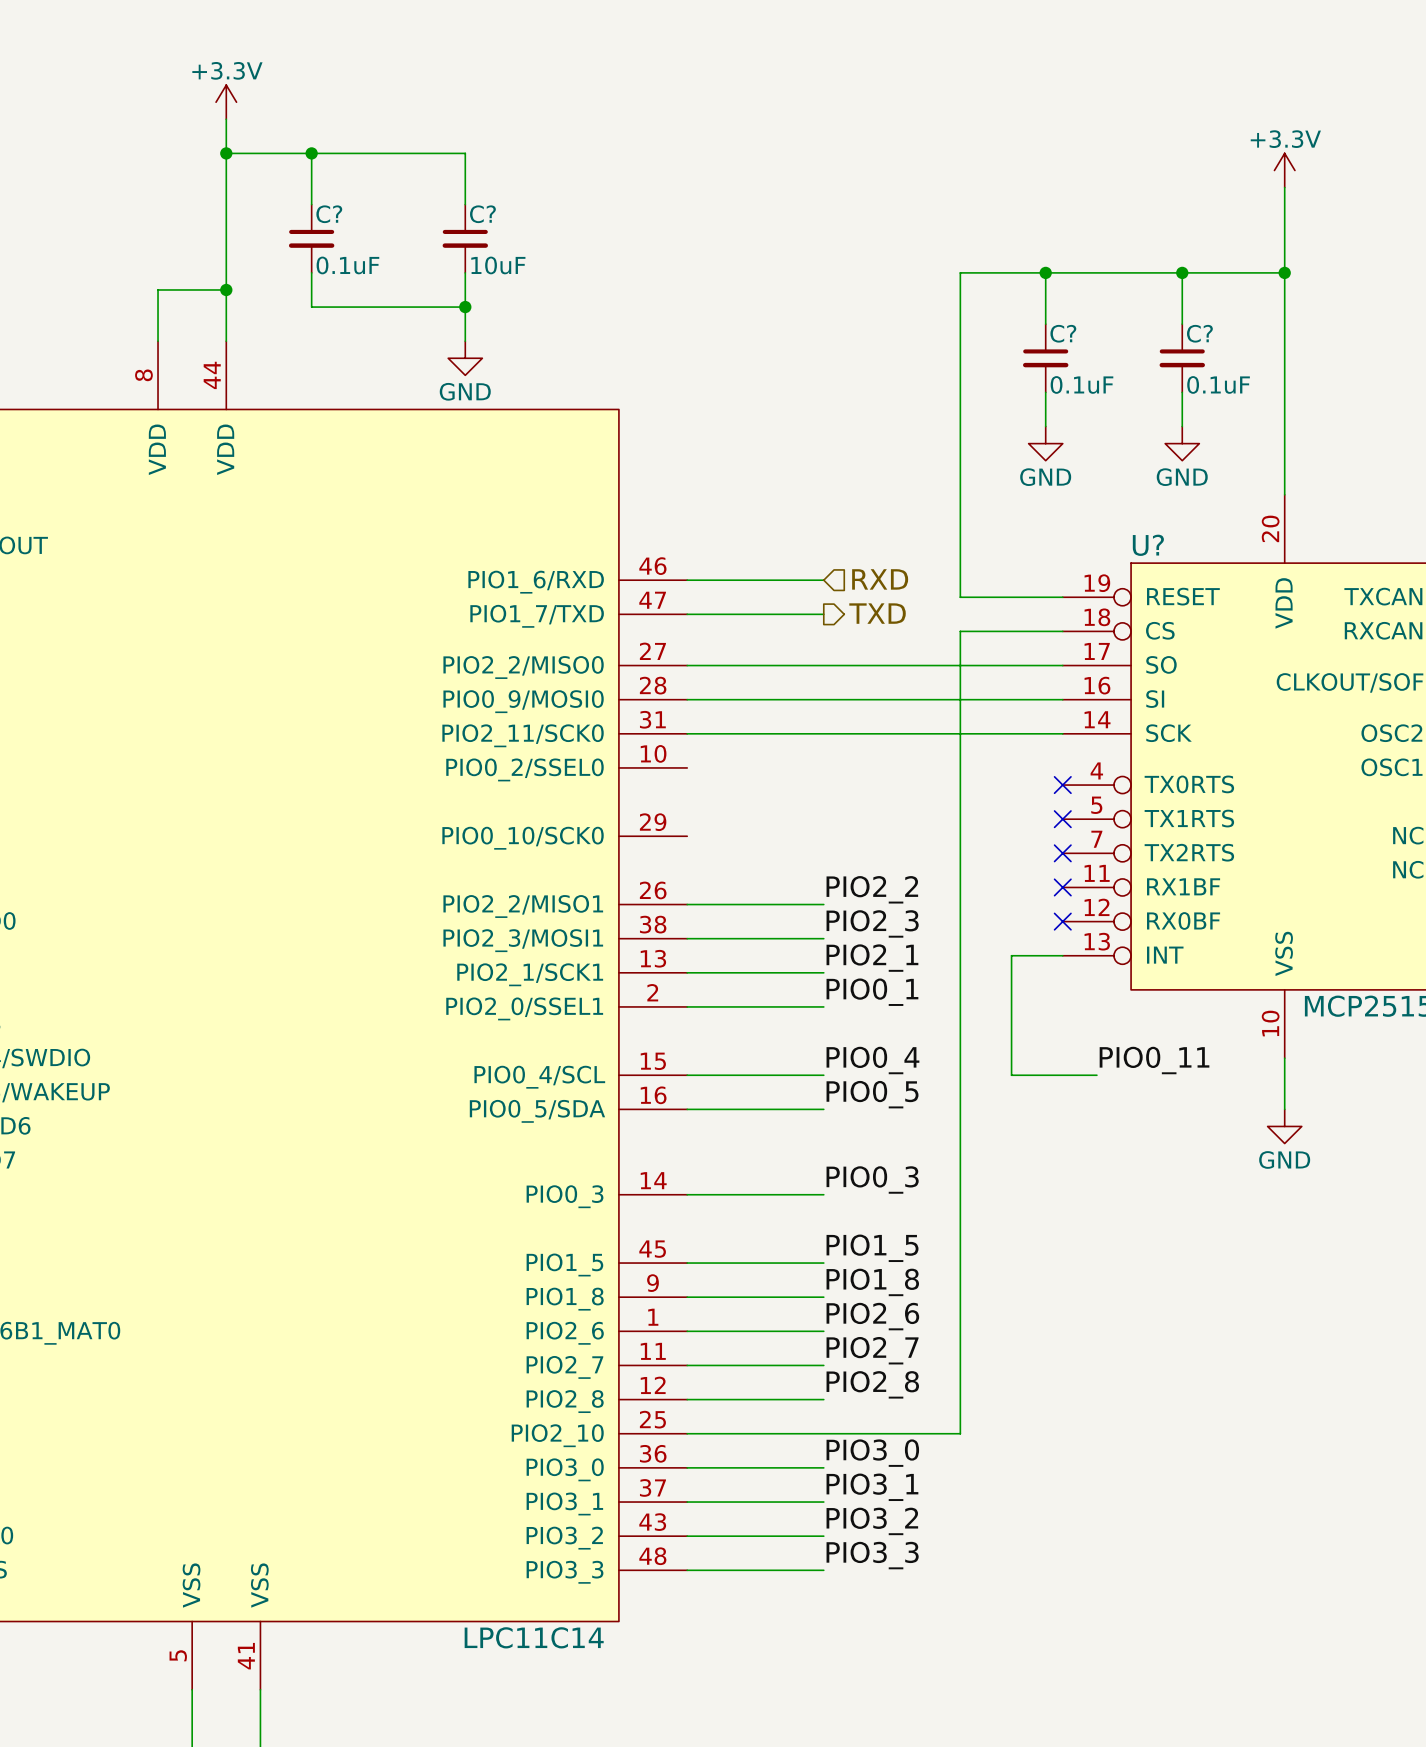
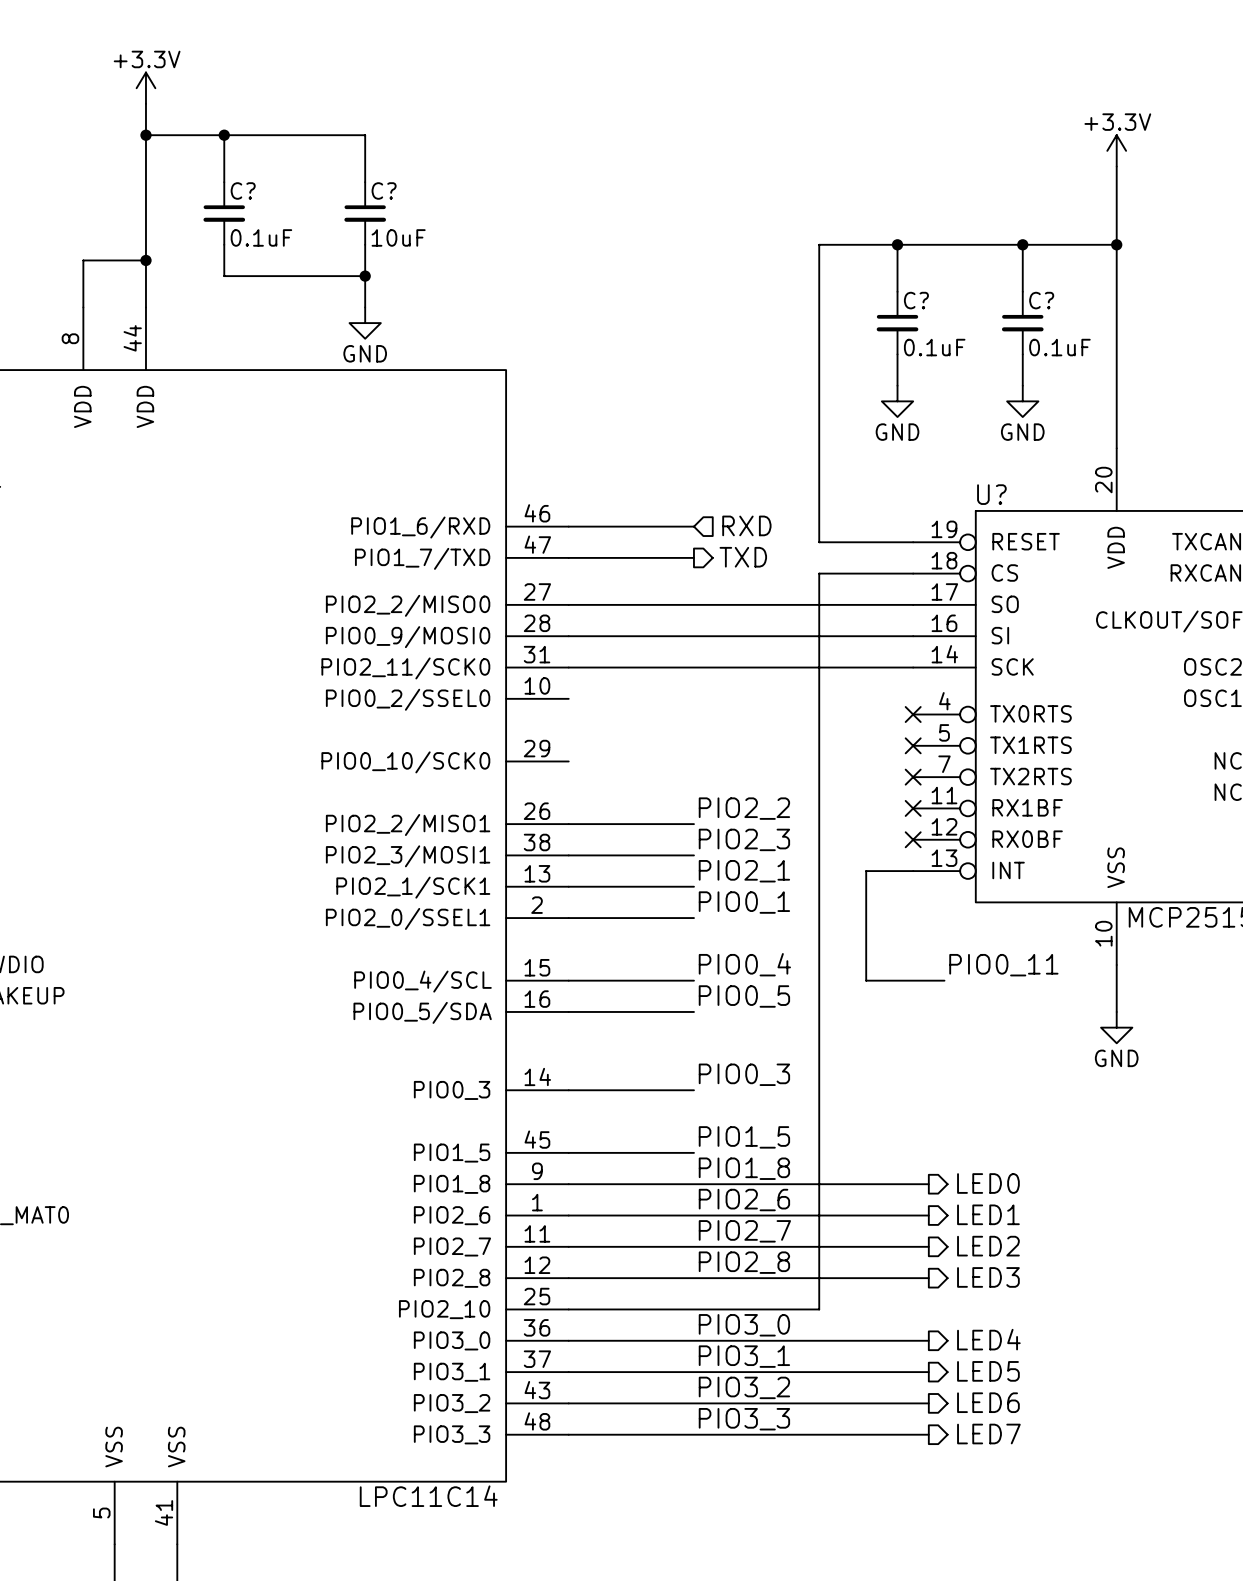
hierarchical label: none -> LED0 (988, 1183)
wire: none -> (693, 1184) (928, 1184)
hierarchical label: none -> LED1 (988, 1214)
wire: none -> (693, 1215) (928, 1215)
hierarchical label: none -> LED2 (988, 1246)
wire: none -> (693, 1246) (928, 1246)
hierarchical label: none -> LED3 (988, 1277)
wire: none -> (693, 1278) (928, 1278)
wire: none -> (693, 1340) (928, 1340)
hierarchical label: none -> LED4 (988, 1339)
hierarchical label: none -> LED5 (988, 1371)
wire: none -> (693, 1372) (928, 1372)
hierarchical label: none -> LED6 (988, 1402)
wire: none -> (693, 1403) (928, 1403)
hierarchical label: none -> LED7 (988, 1434)
wire: none -> (693, 1434) (928, 1434)

